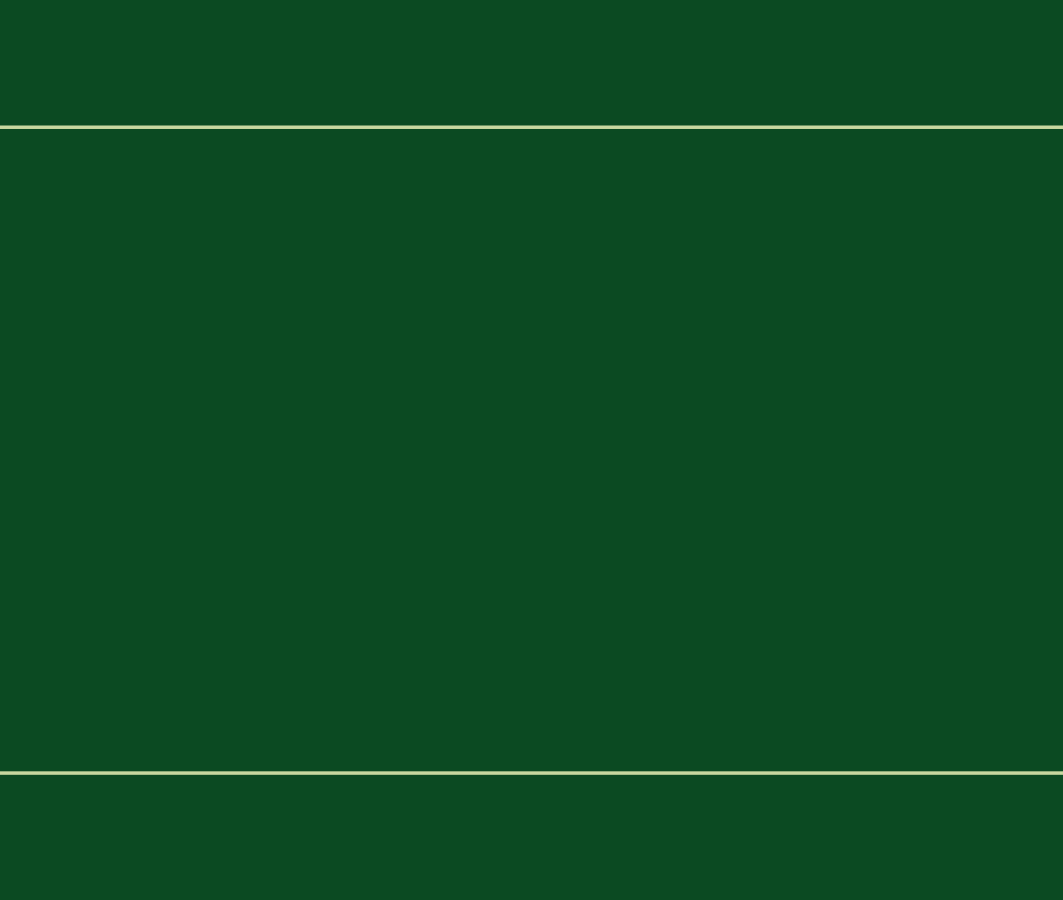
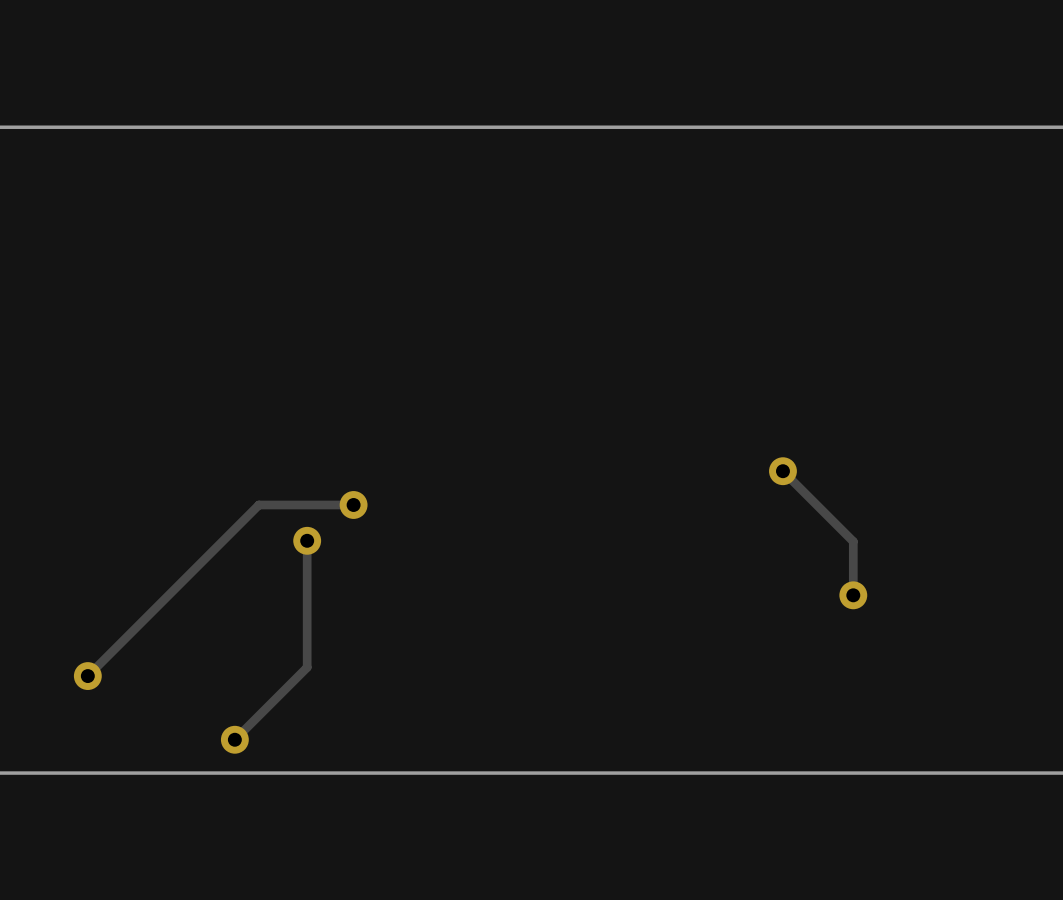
track: none -> (782, 471) (853, 541) (853, 595)
via: none -> (782, 471)
via: none -> (353, 504)
track: none -> (356, 507) (353, 504) (258, 504) (87, 676)
track: none -> (307, 540) (307, 667) (234, 739)
via: none -> (307, 540)
via: none -> (853, 595)
via: none -> (87, 676)
via: none -> (234, 739)

